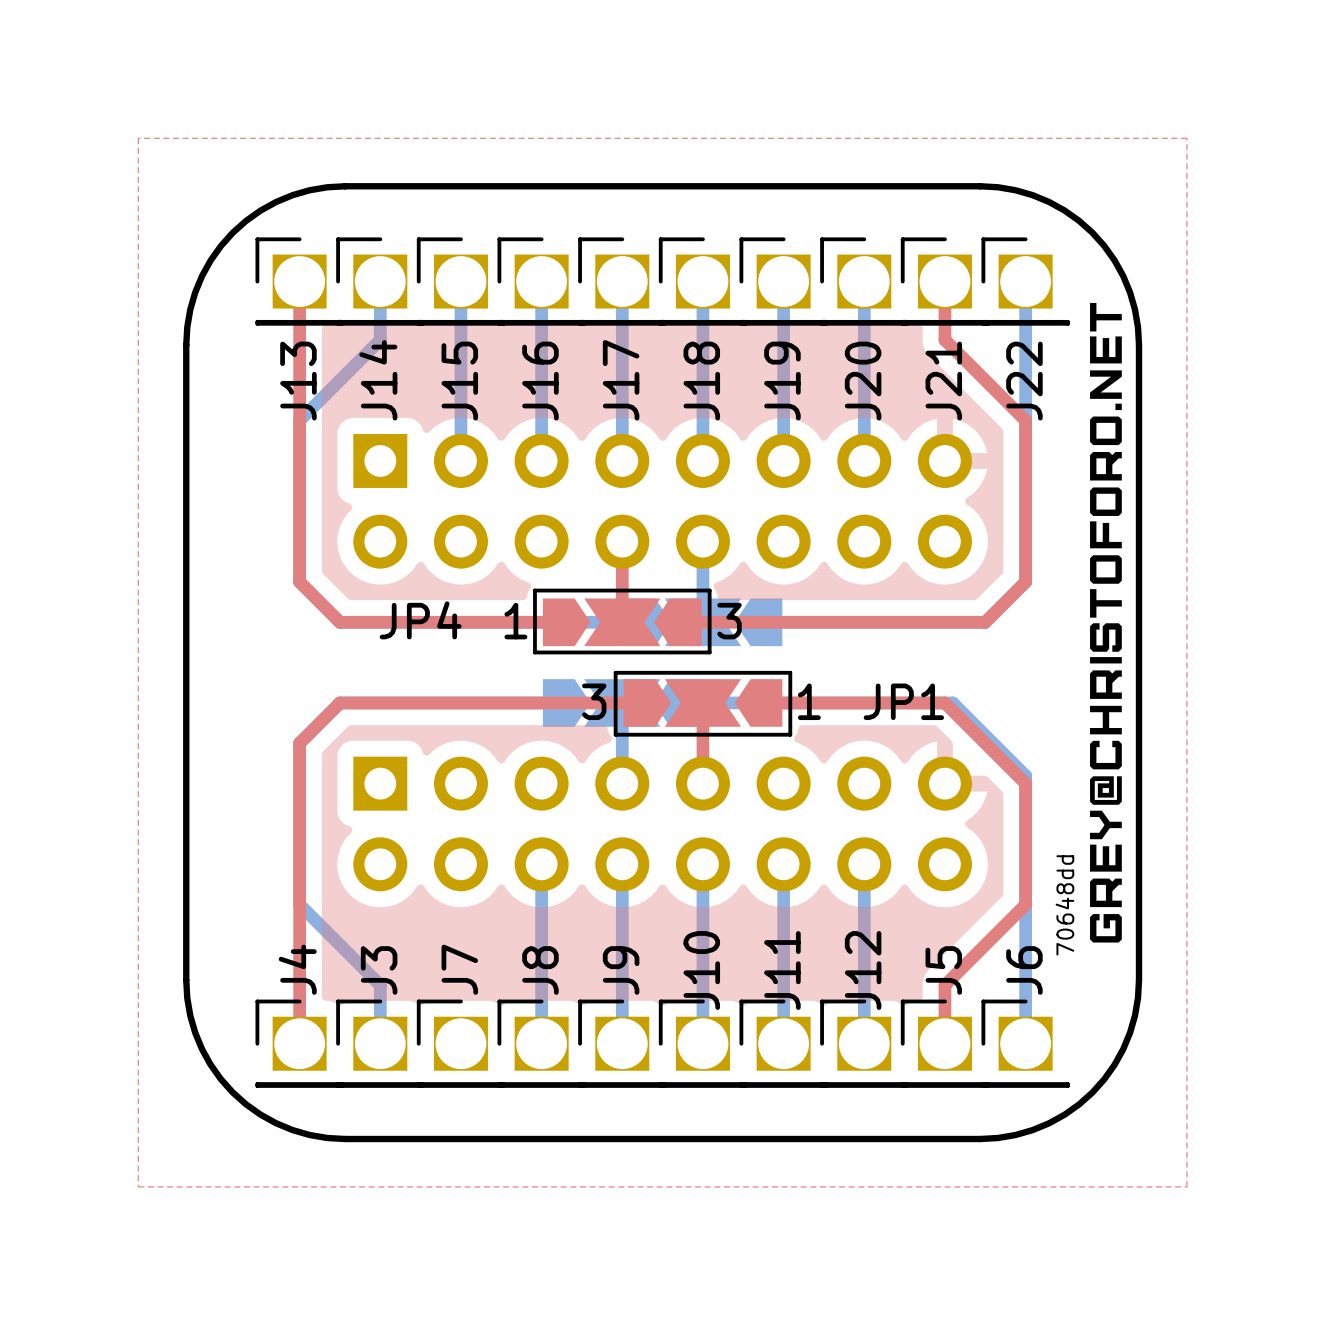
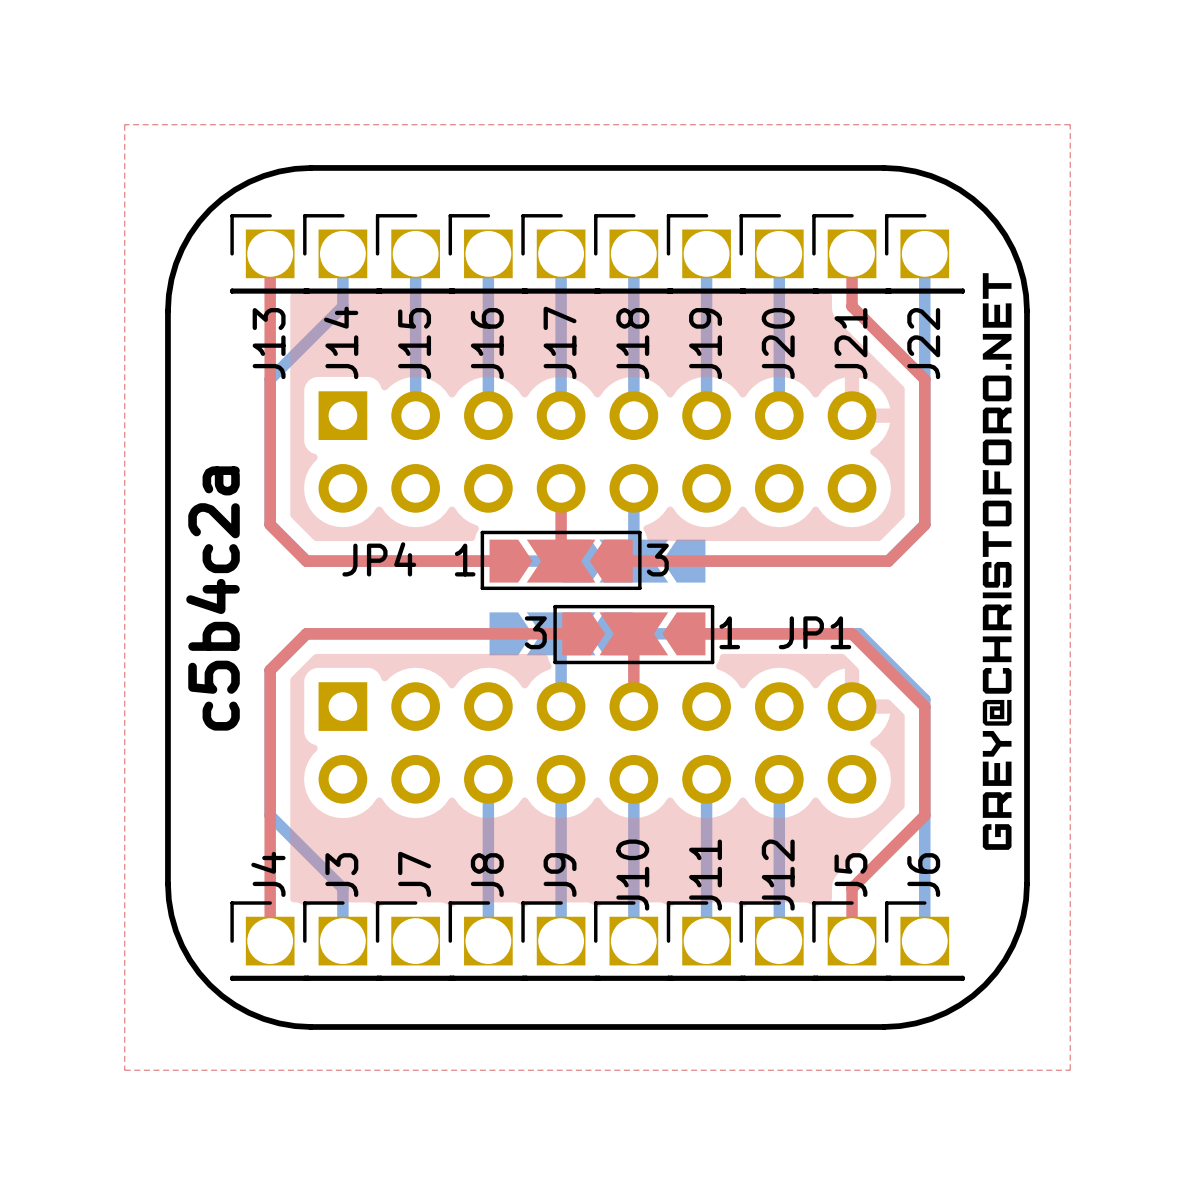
text: none -> c5b4c2a (213, 598)
text: 70648dd (1064, 905) -> none

